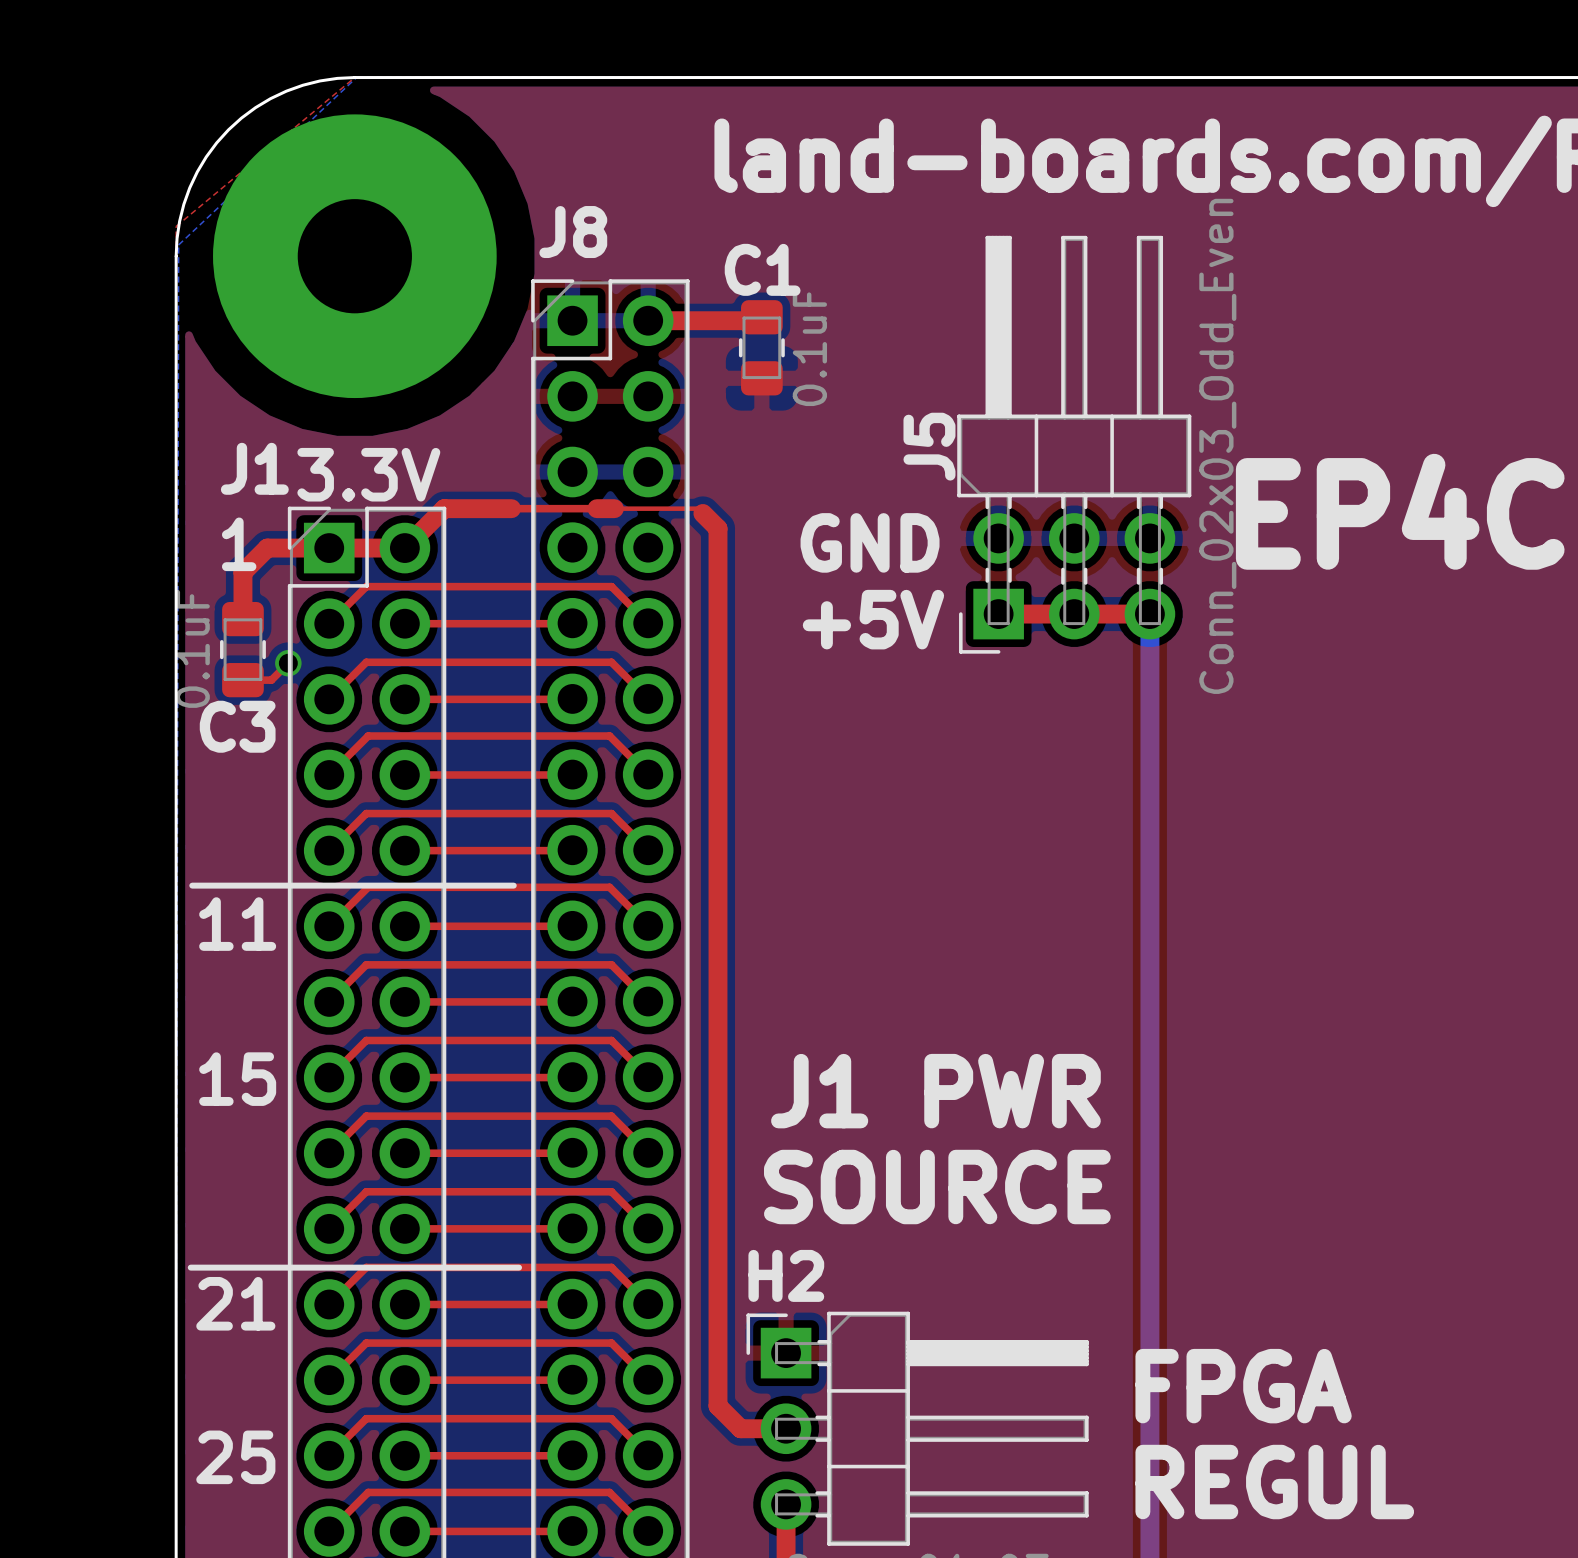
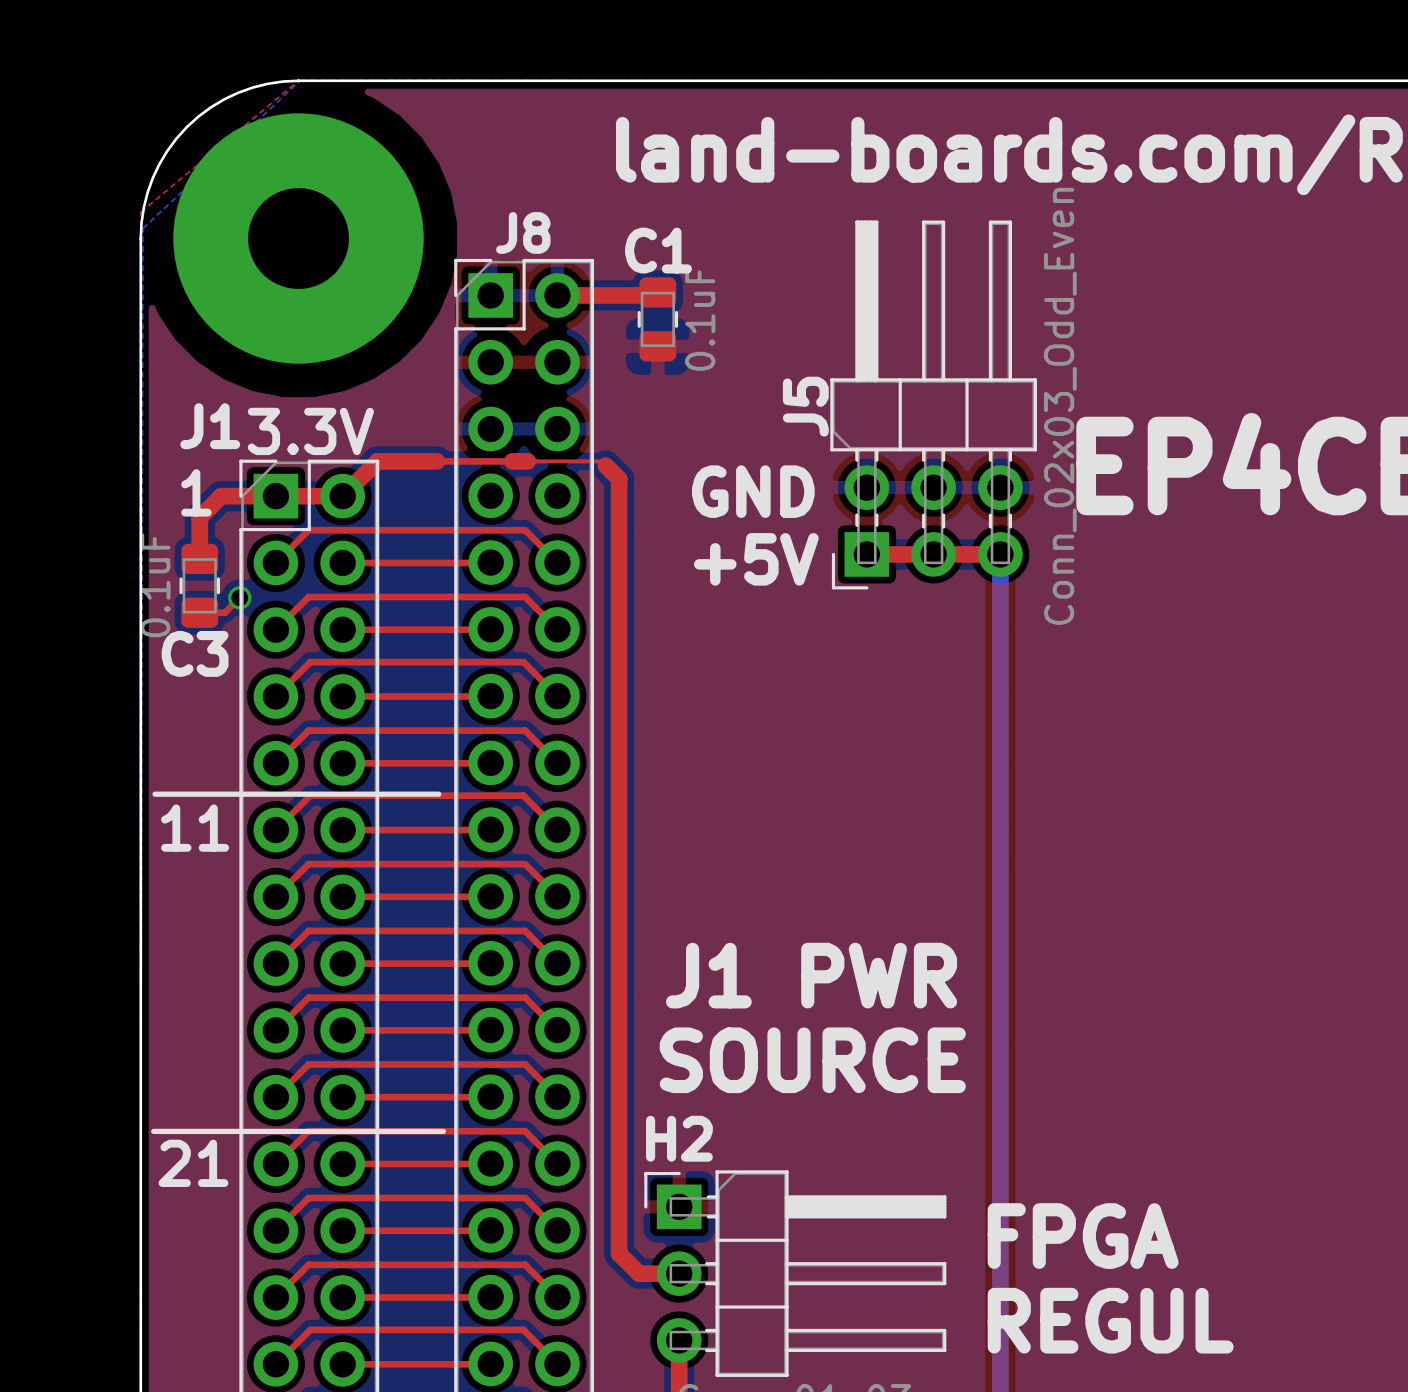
J8 name position: J8 (573, 232) -> J8 (523, 232)
text: 15 (237, 1079) -> none
text: 25 (235, 1457) -> none

